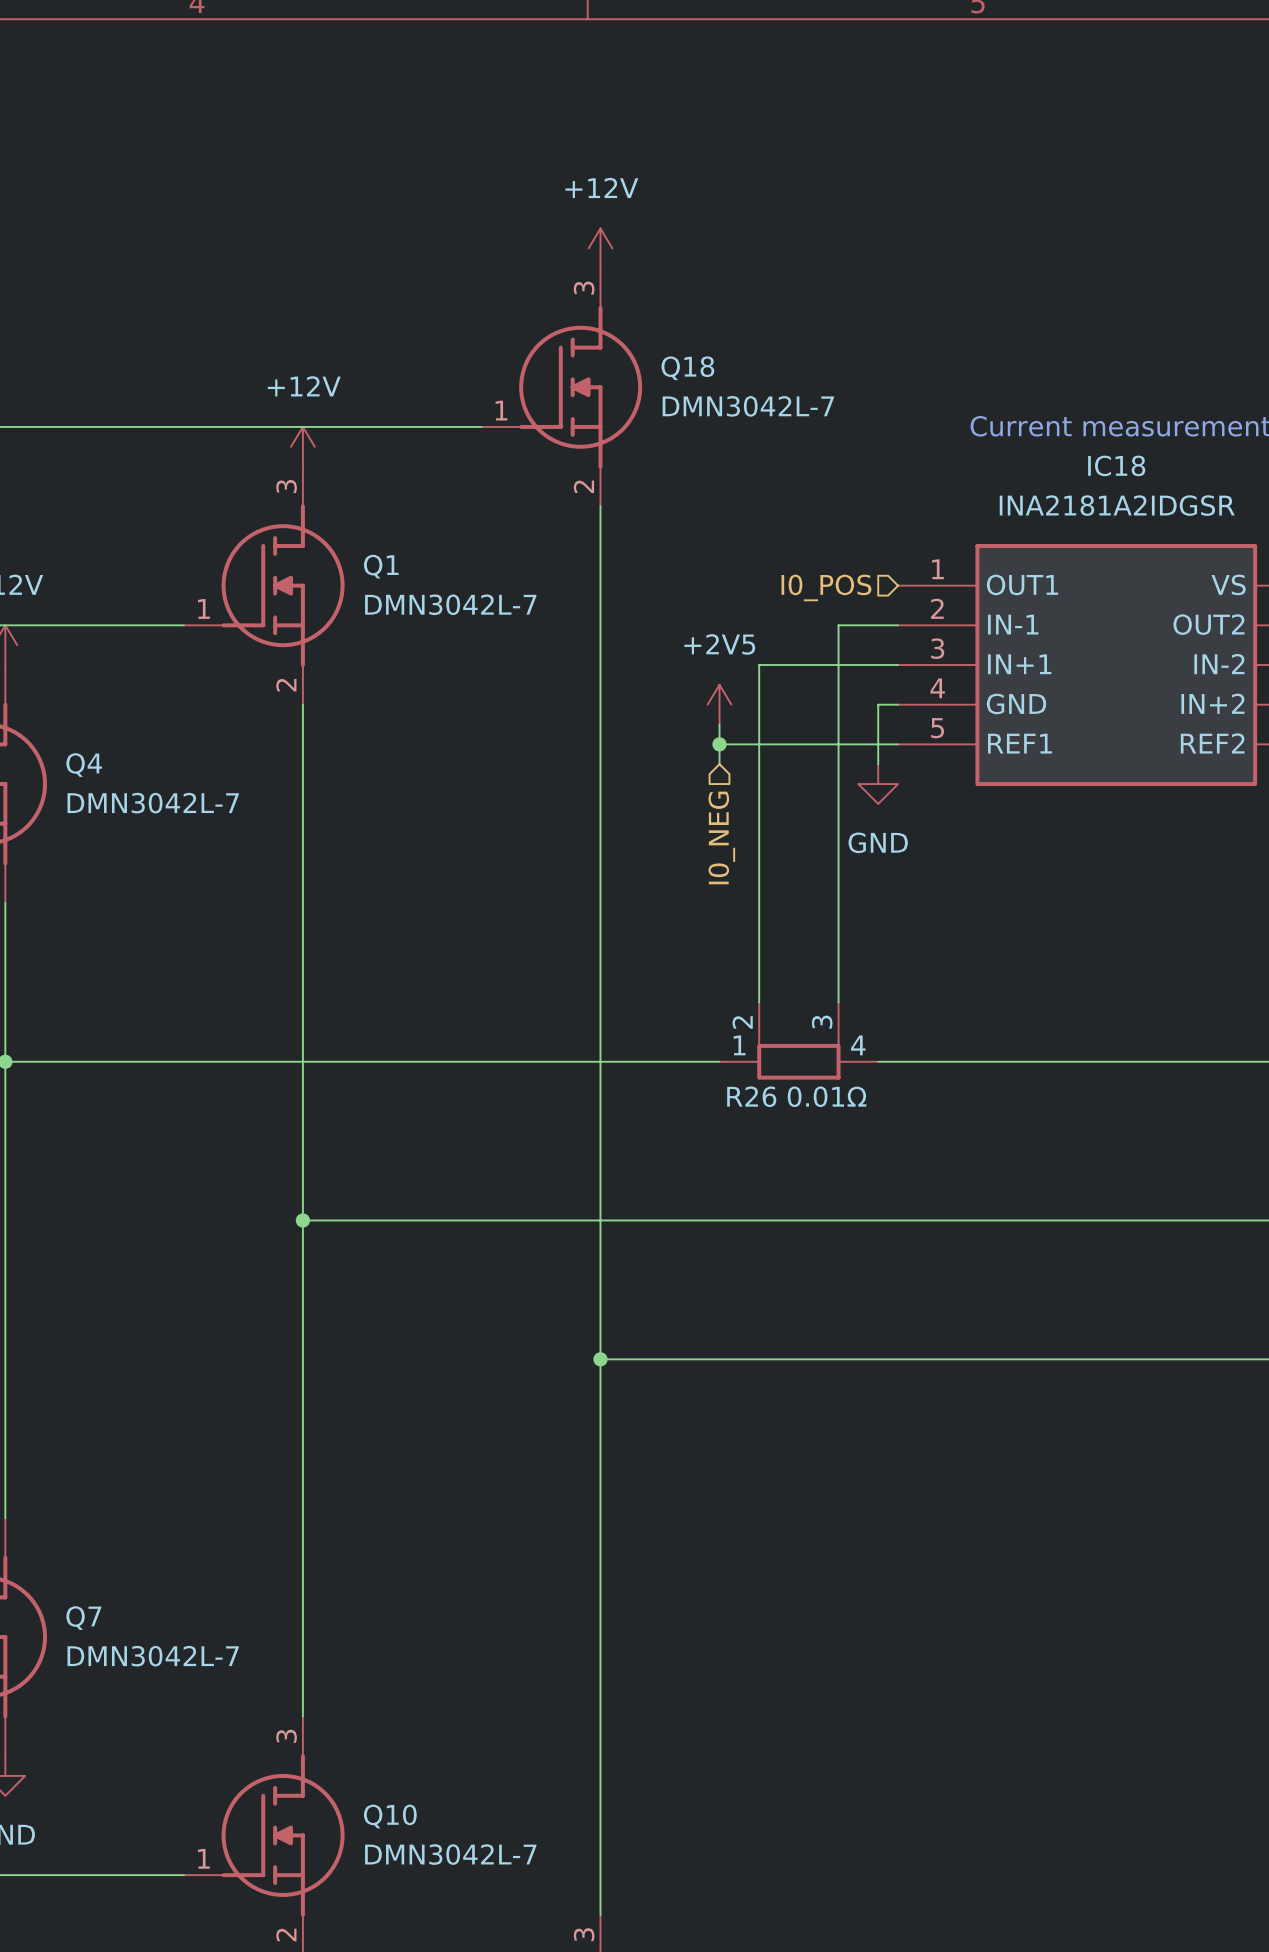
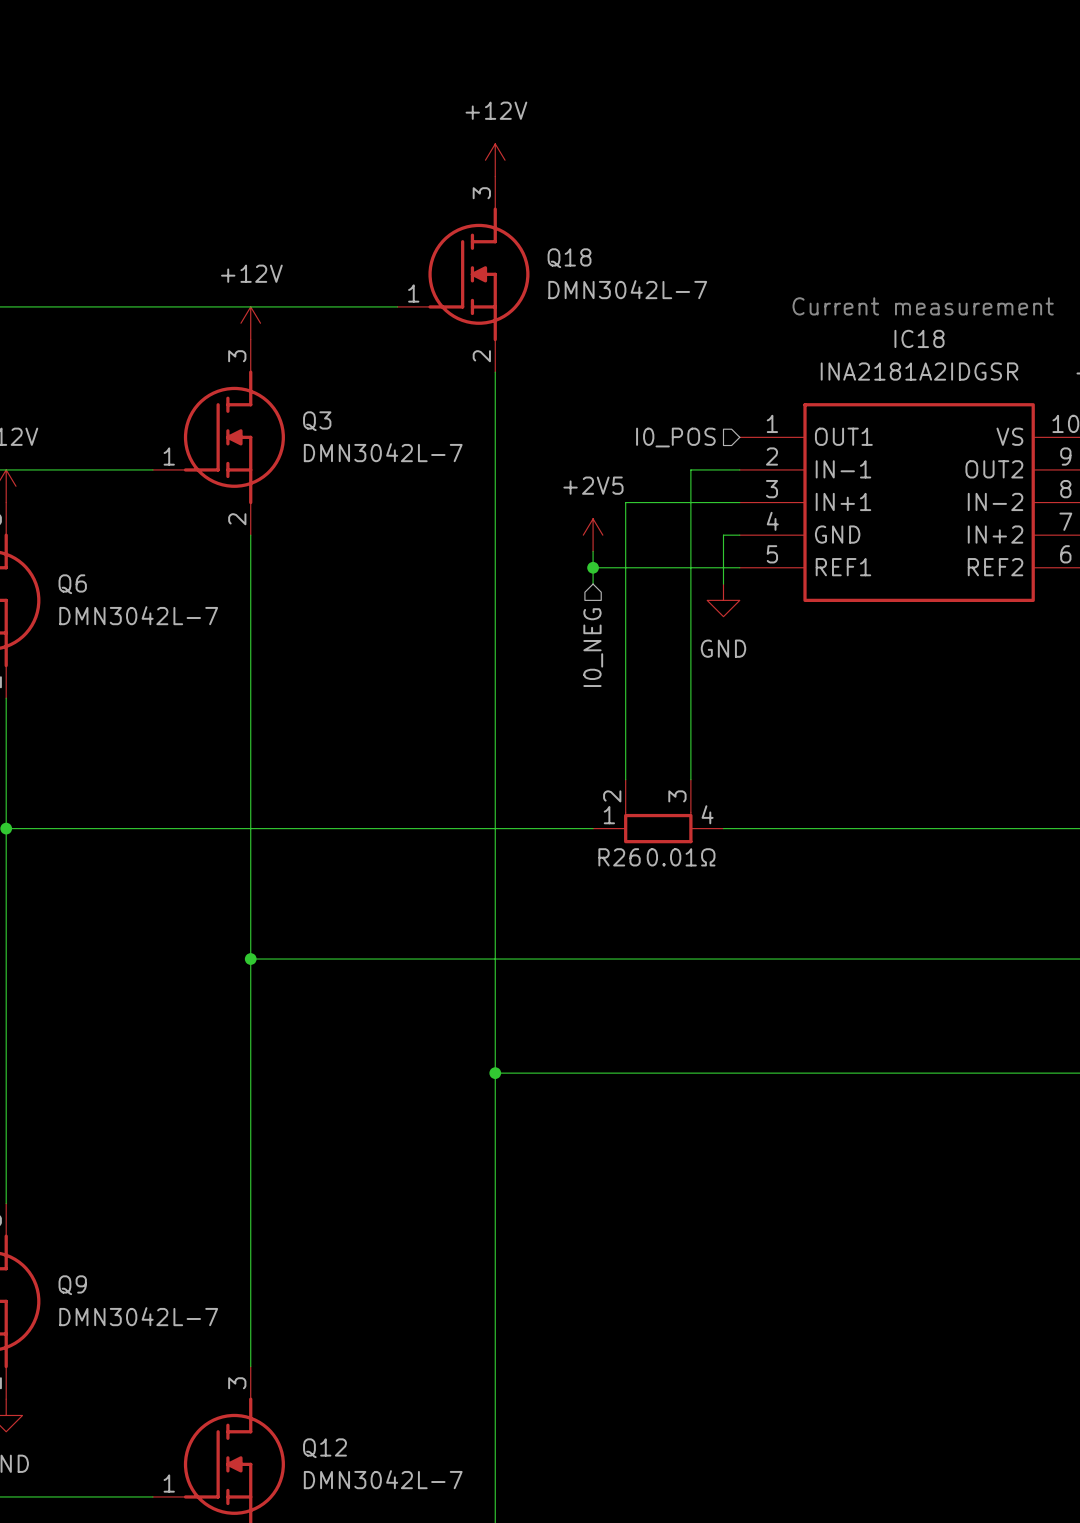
Q1 name: Q1 (381, 566) -> Q3 (317, 421)
Q4 name: Q4 (84, 765) -> Q6 (72, 584)
Q7 name: Q7 (83, 1618) -> Q9 (72, 1285)
Q10 name: Q10 (390, 1816) -> Q12 (324, 1448)

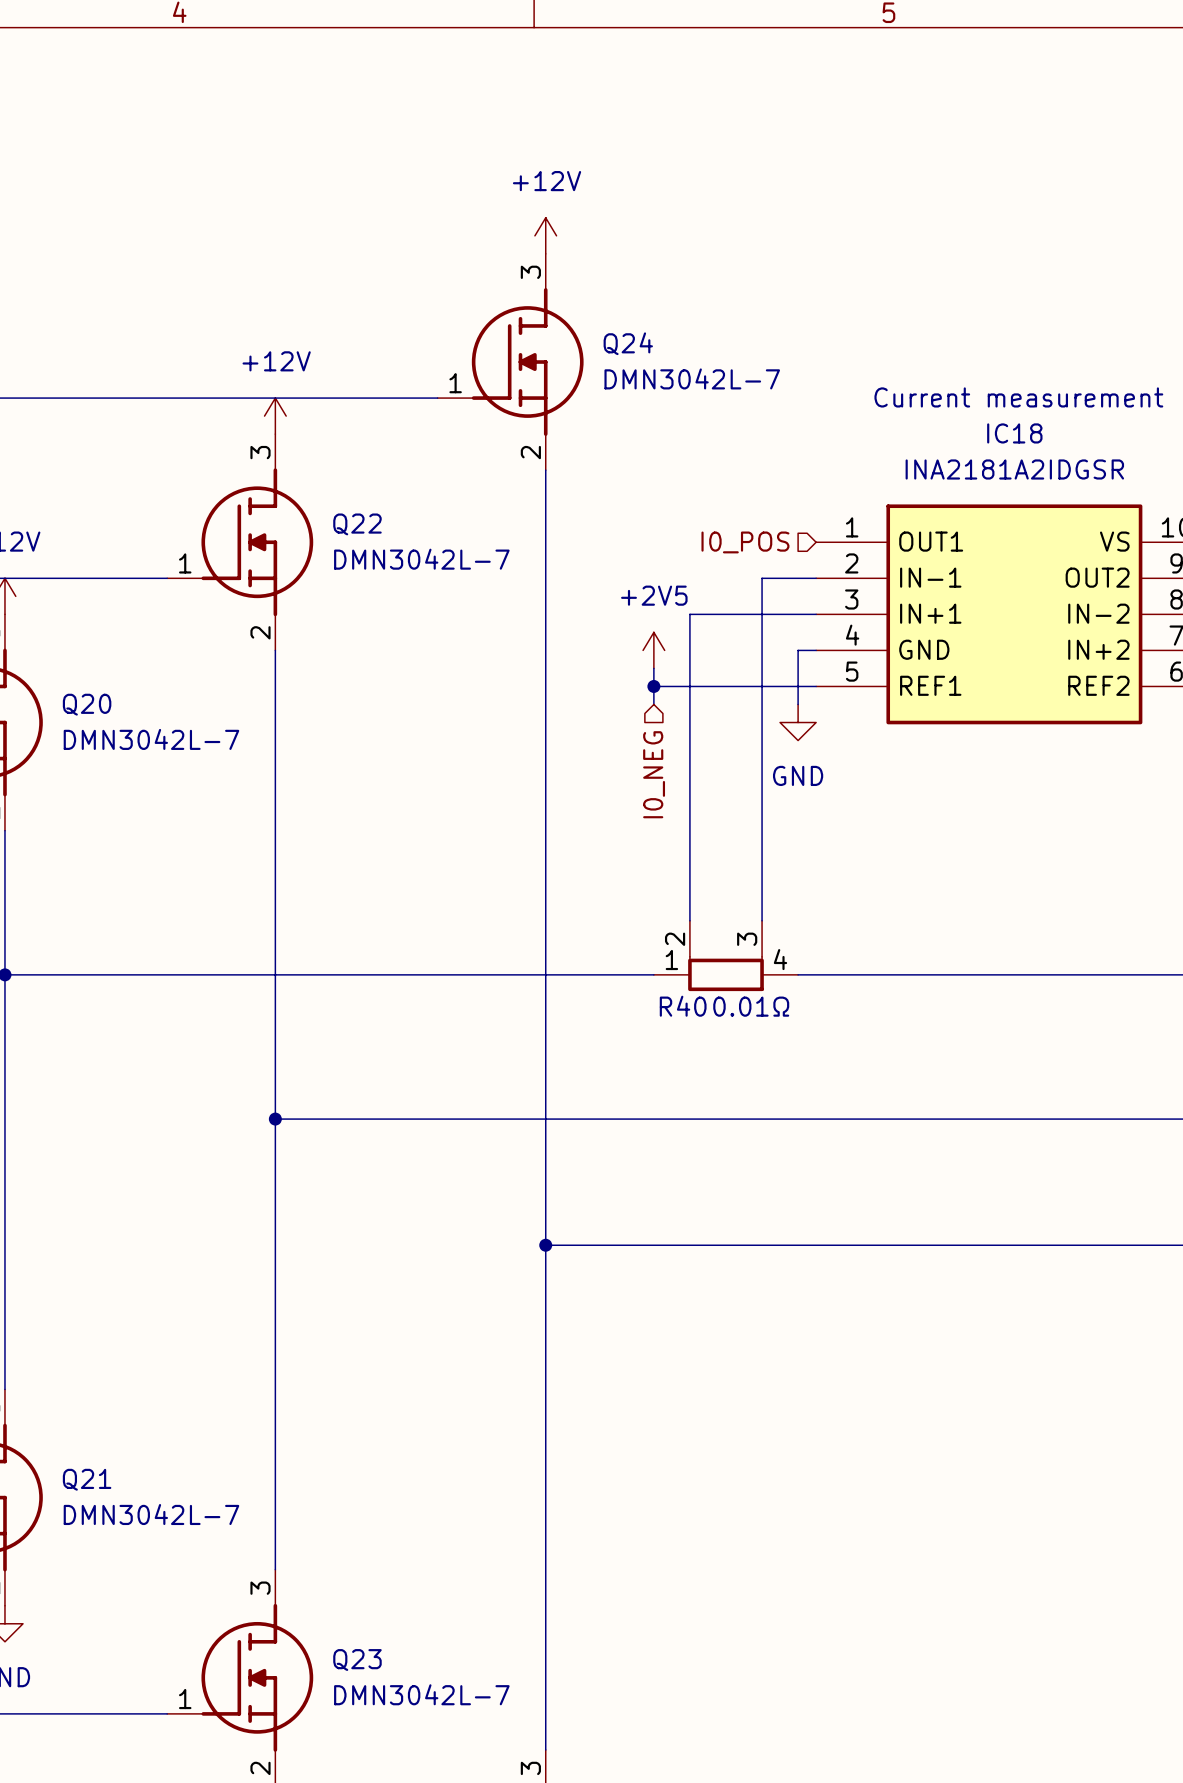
Q18 name: Q18 (569, 258) -> Q24 (628, 343)
Q3 name: Q3 (317, 421) -> Q22 (357, 524)
Q6 name: Q6 (72, 584) -> Q20 (87, 704)
R26 name: R26 (619, 857) -> R40 (683, 1006)
Q9 name: Q9 (72, 1285) -> Q21 (87, 1479)
Q12 name: Q12 (324, 1448) -> Q23 (357, 1660)

